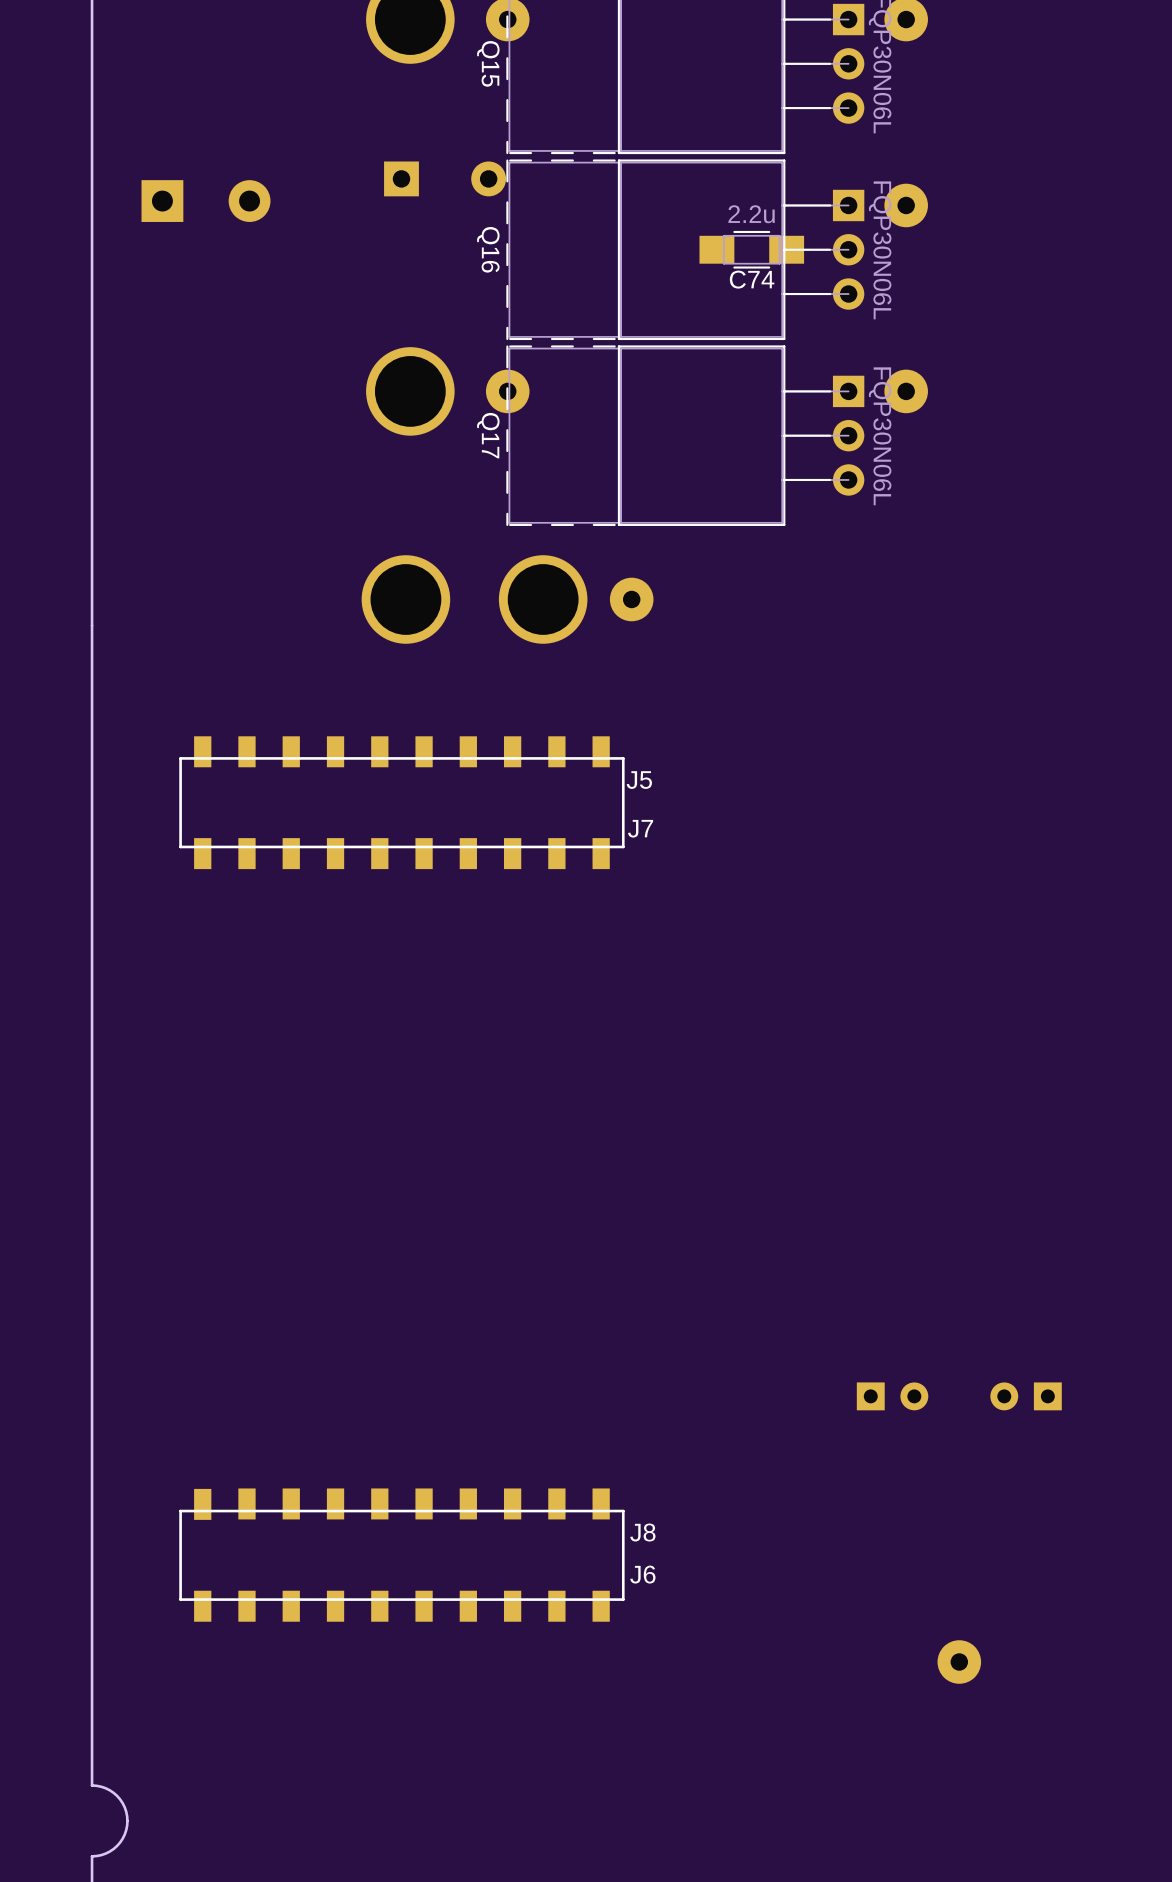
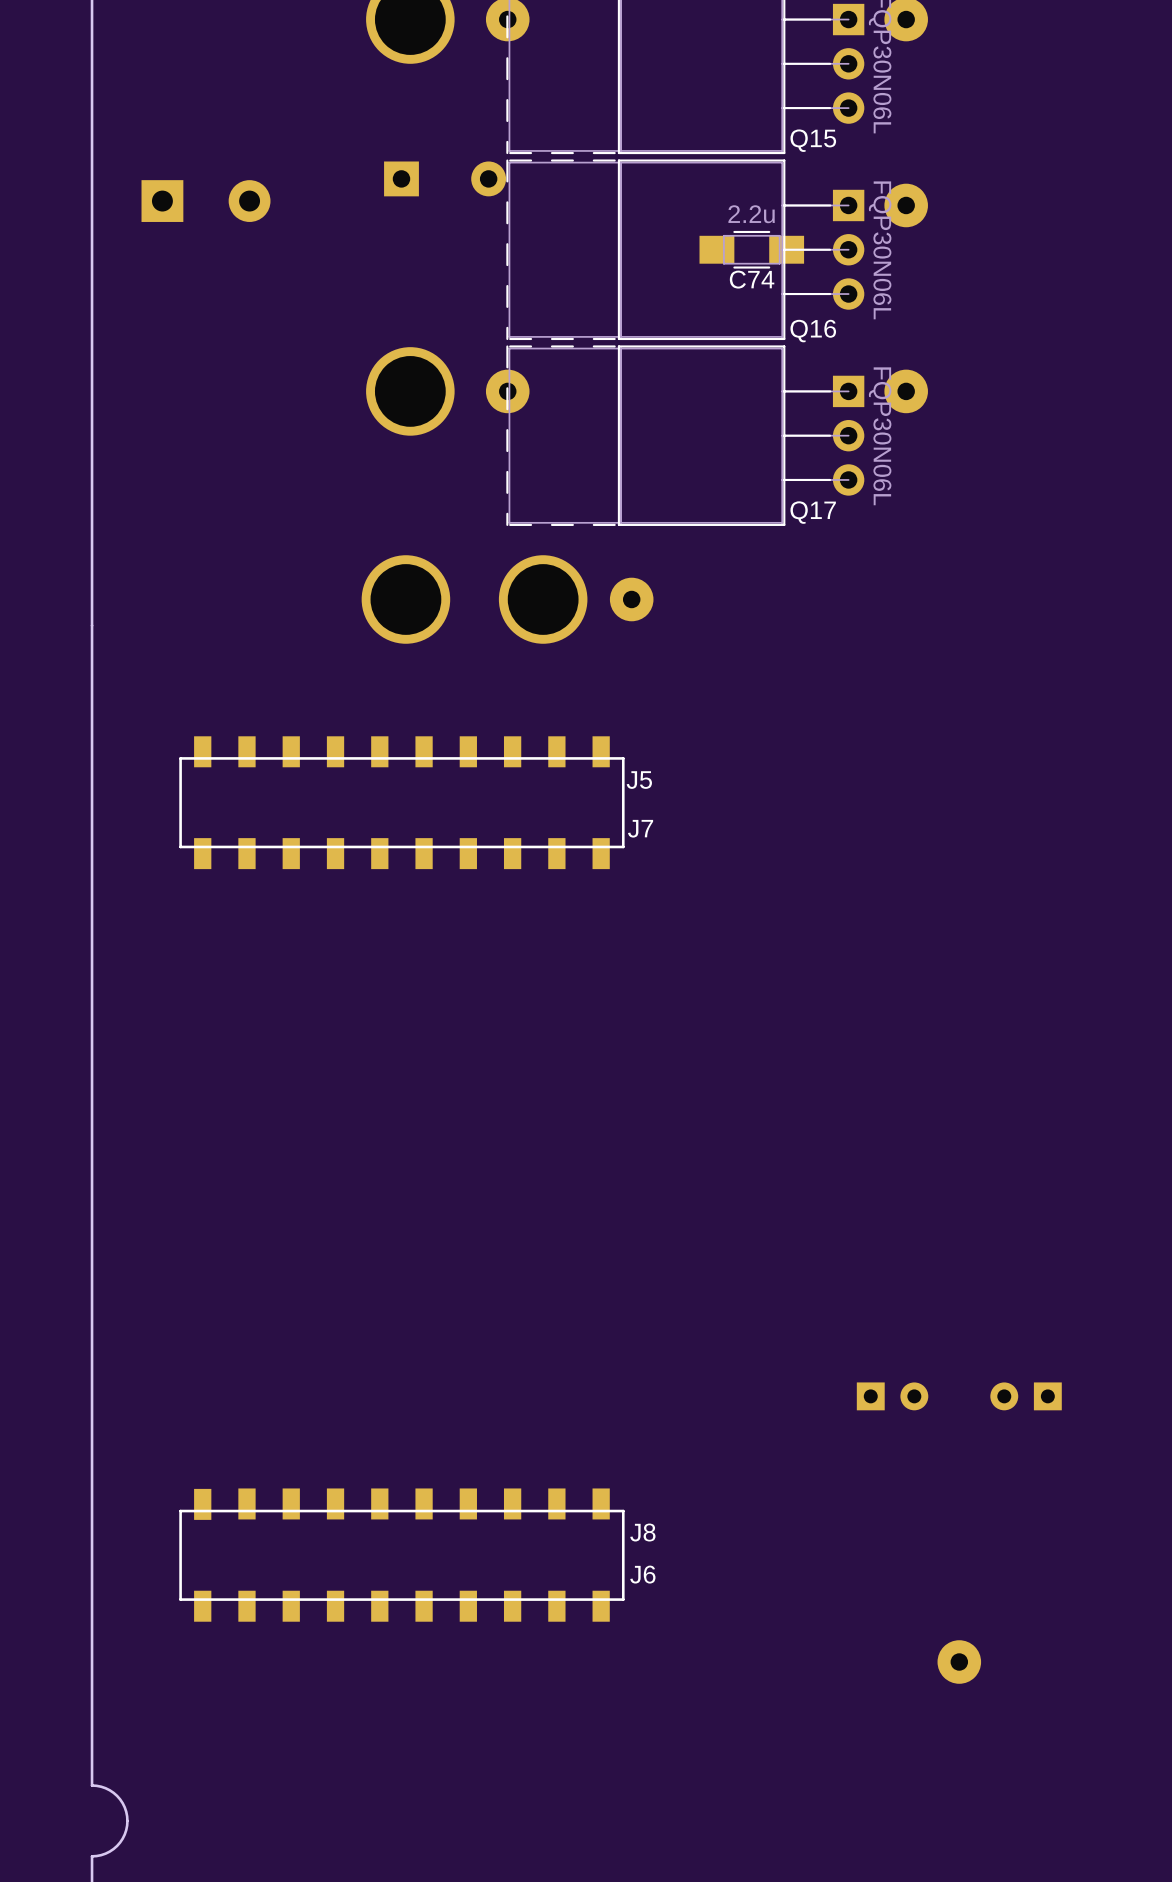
Q15 name rotation: 0° (488, 63) -> 90° counterclockwise (813, 140)
Q15 name position: Q15 (488, 63) -> Q15 (813, 140)
Q16 name rotation: 0° (488, 249) -> 90° counterclockwise (813, 331)
Q16 name position: Q16 (488, 249) -> Q16 (813, 331)
Q17 name rotation: 0° (488, 435) -> 90° counterclockwise (813, 512)
Q17 name position: Q17 (488, 435) -> Q17 (813, 512)

